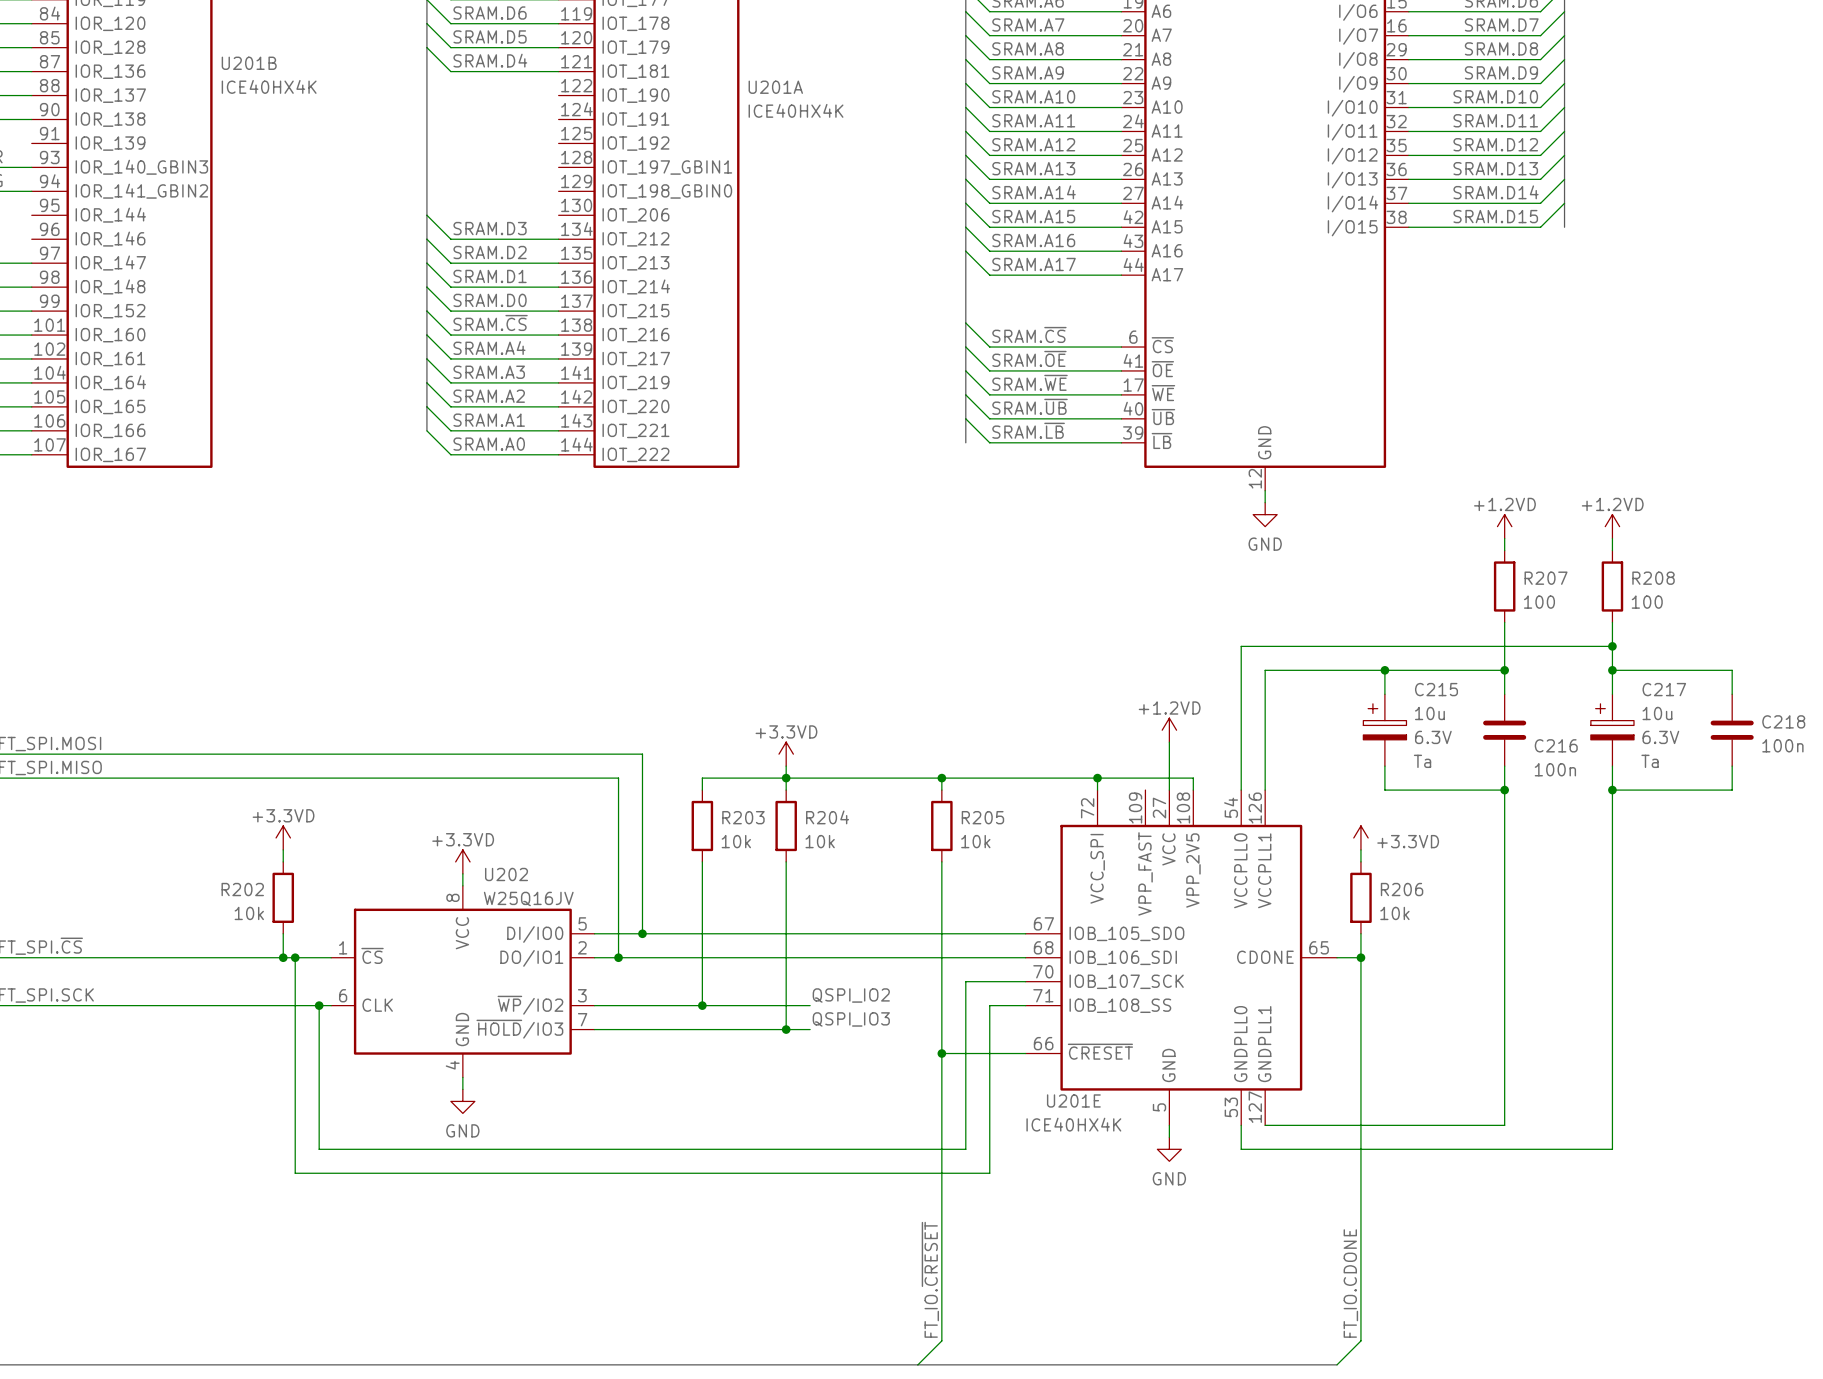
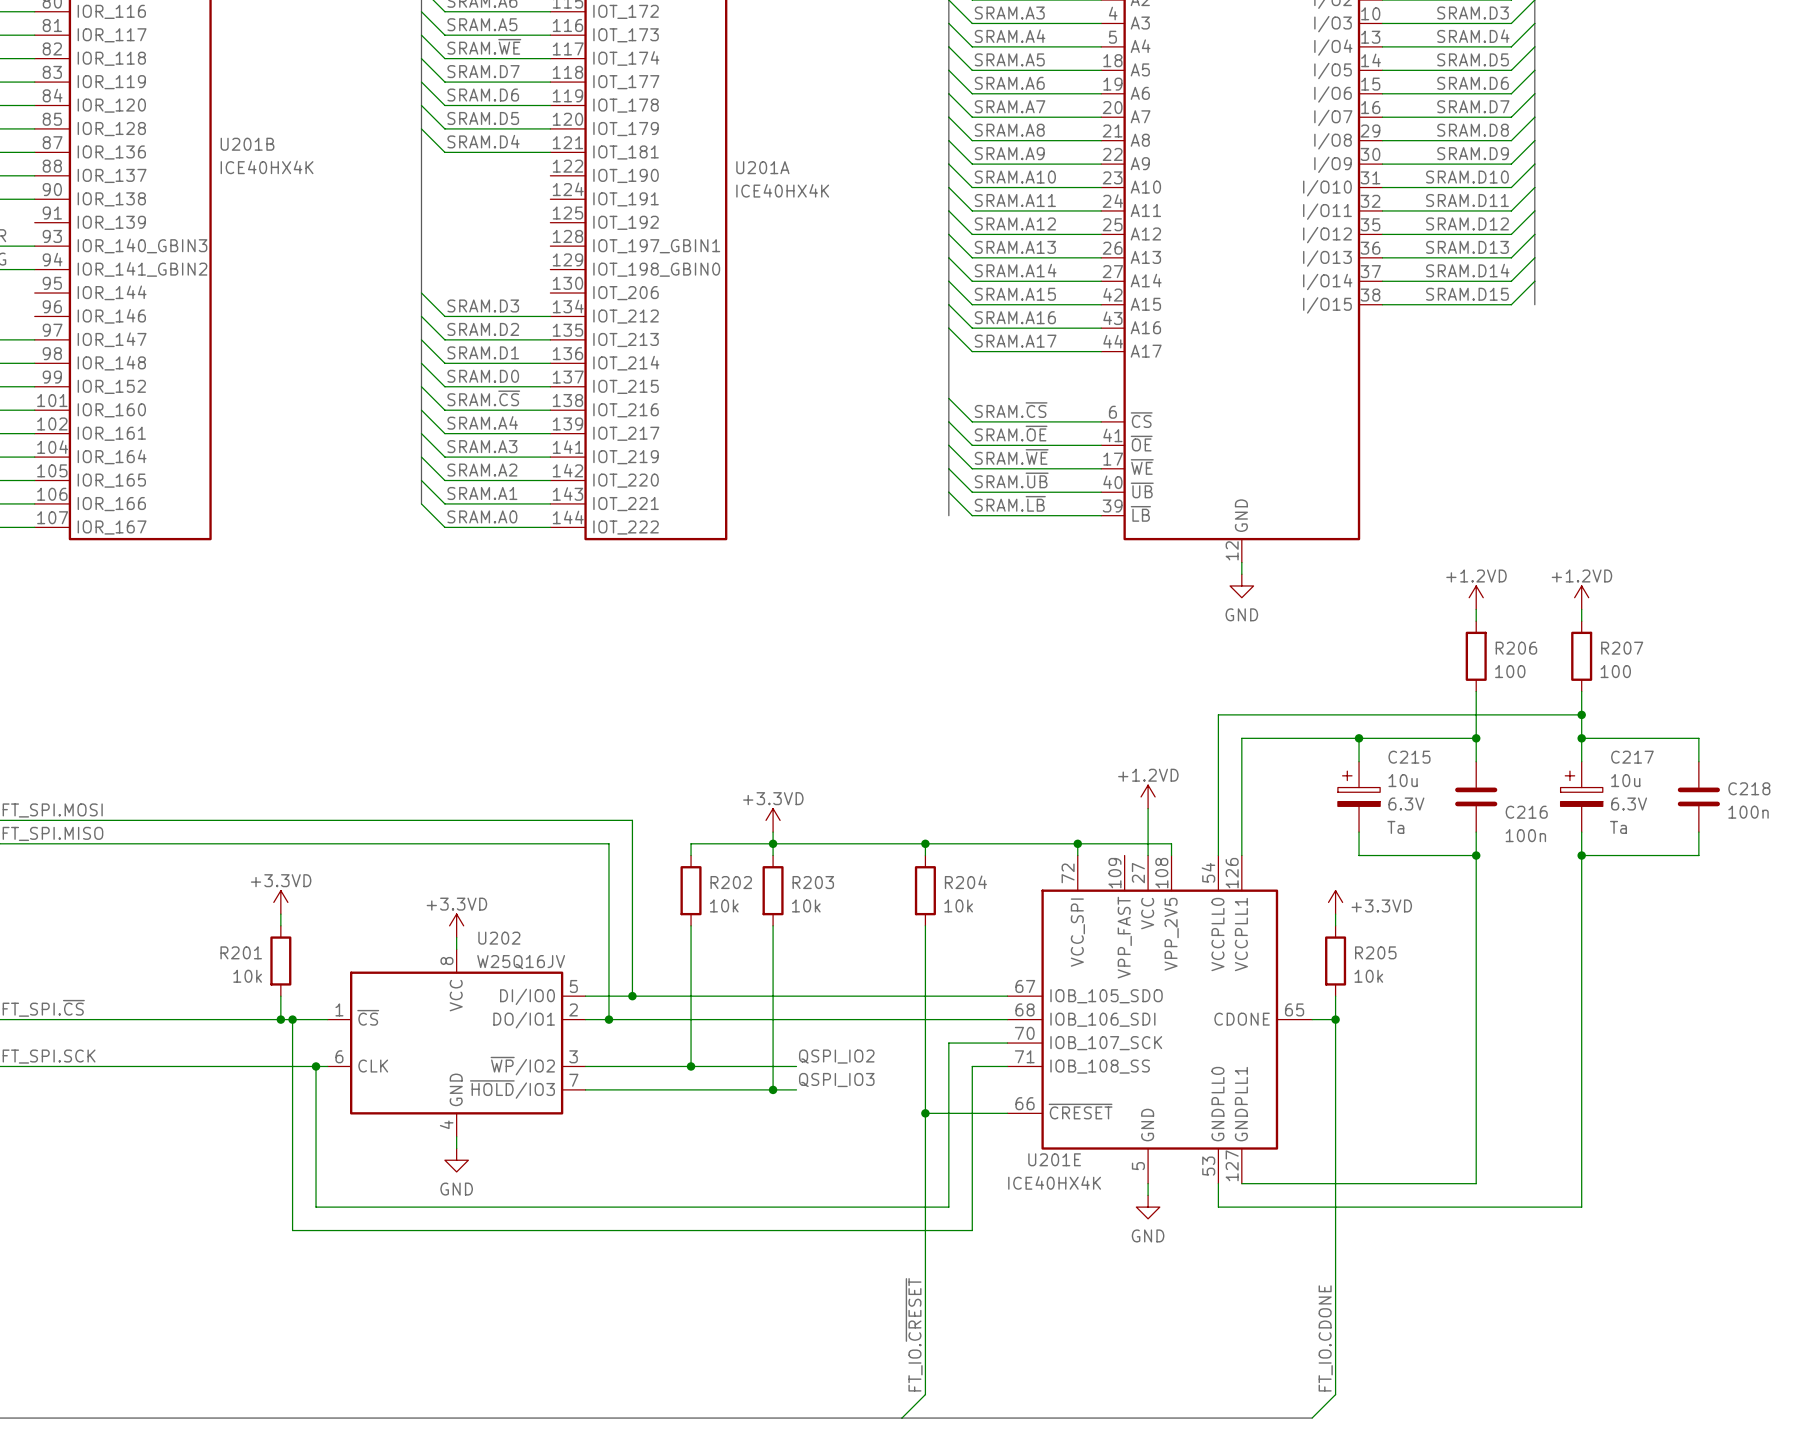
R207 name: R207 (1546, 578) -> R206 (1516, 648)
R208 name: R208 (1653, 578) -> R207 (1622, 648)
R203 name: R203 (743, 817) -> R202 (731, 882)
R204 name: R204 (827, 817) -> R203 (813, 882)
R205 name: R205 (982, 817) -> R204 (965, 882)
R202 name: R202 (242, 889) -> R201 (241, 952)
R206 name: R206 (1402, 889) -> R205 (1375, 952)

